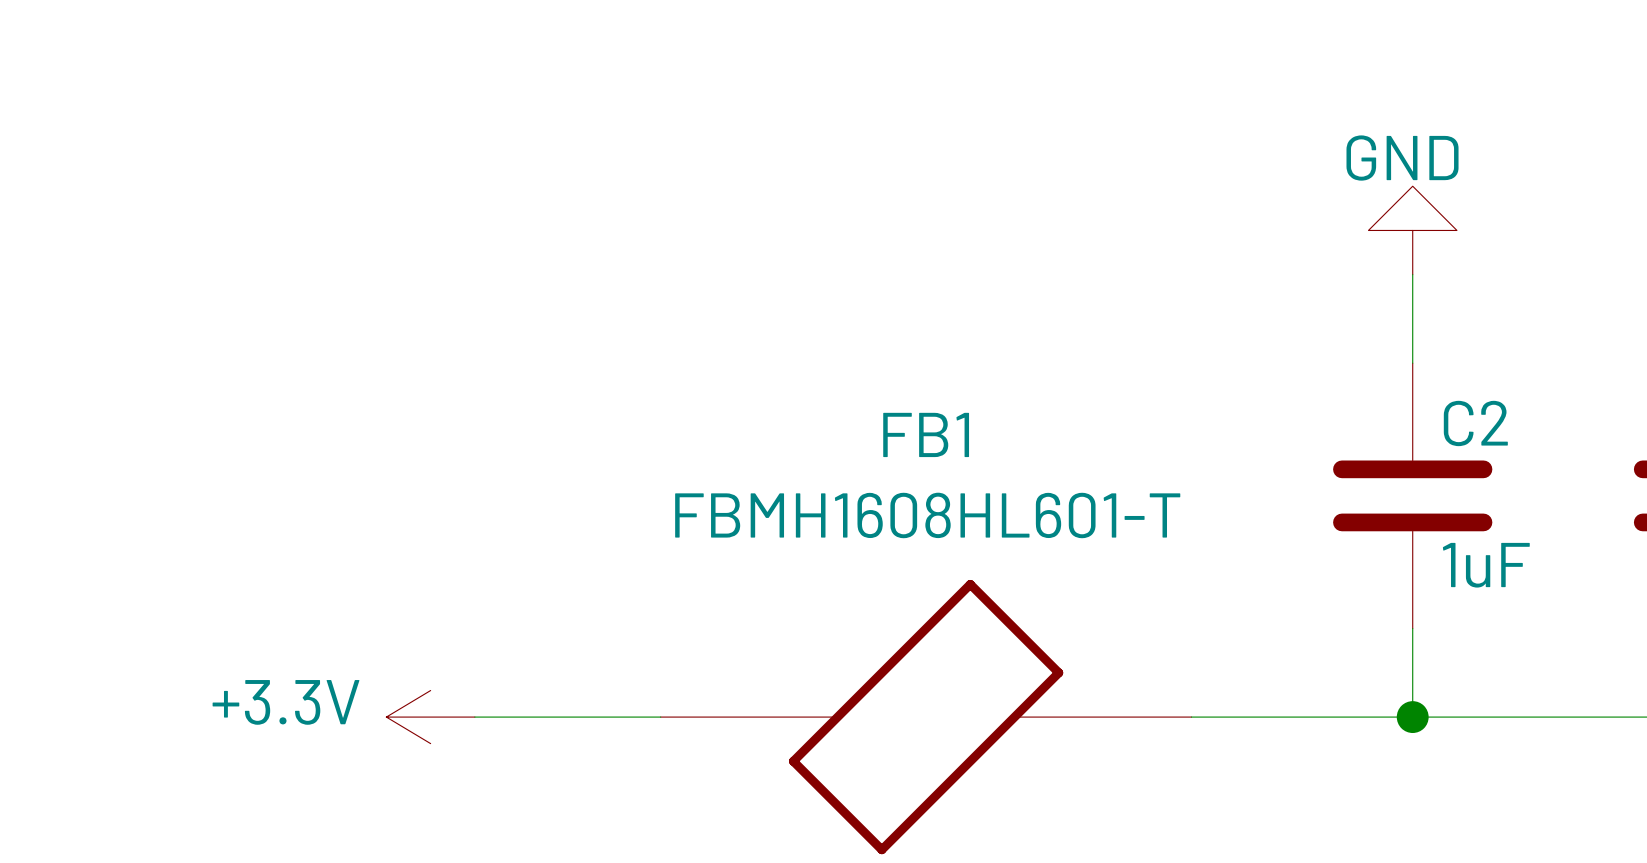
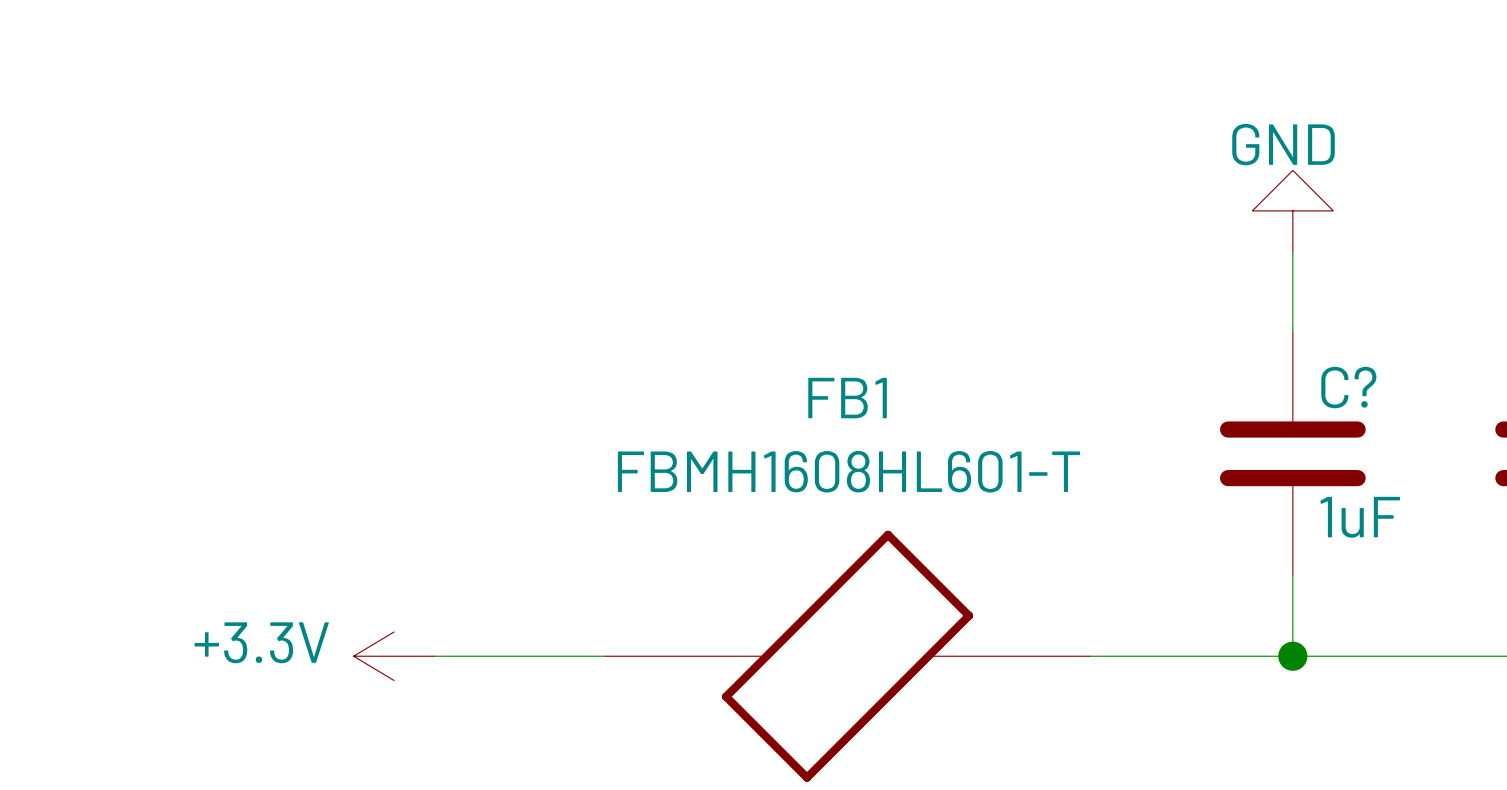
C2 name: C2 (1475, 423) -> C? (1348, 387)

